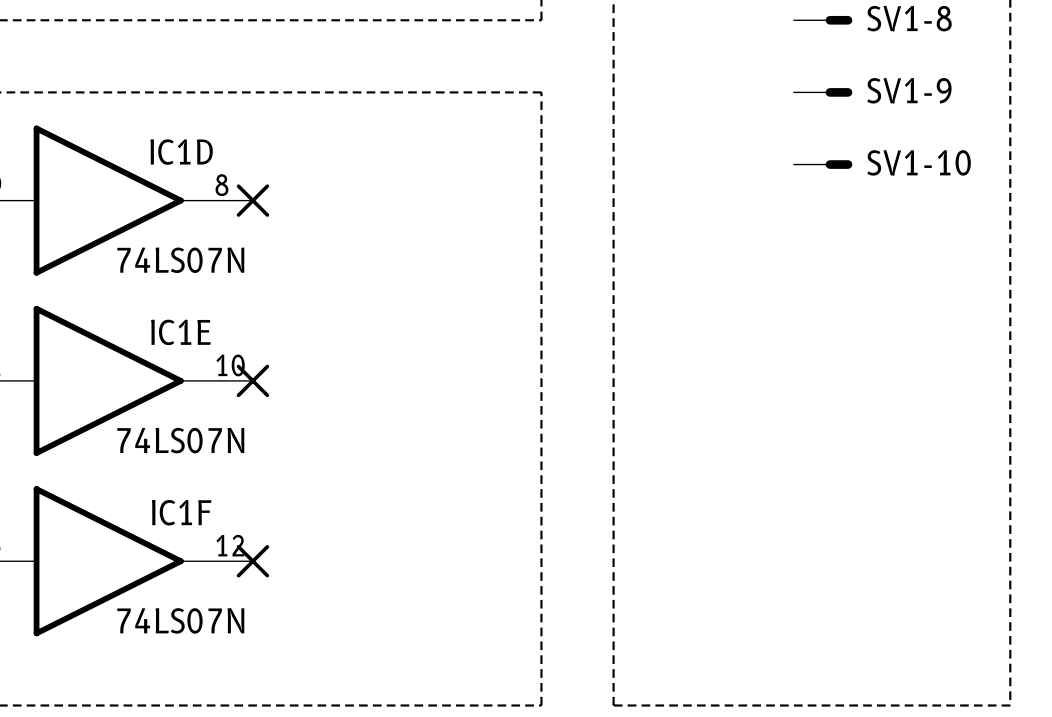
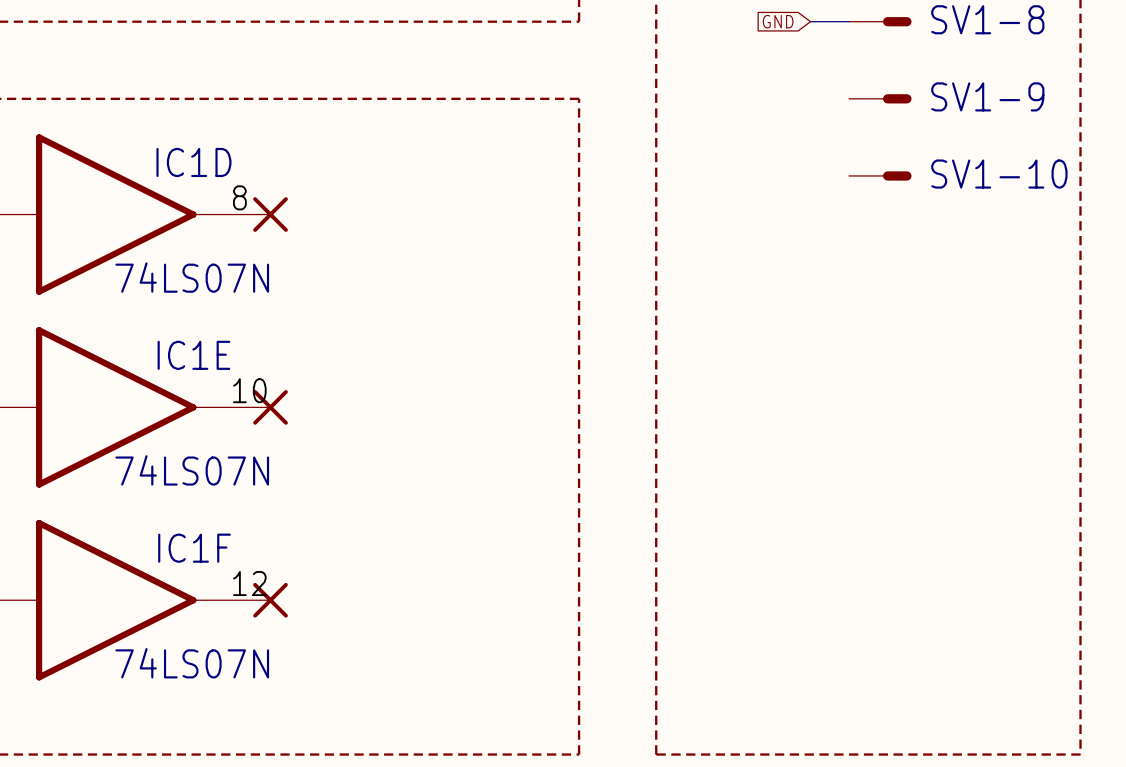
global label: none -> GND (778, 21)
wire: none -> (810, 21) (849, 21)

